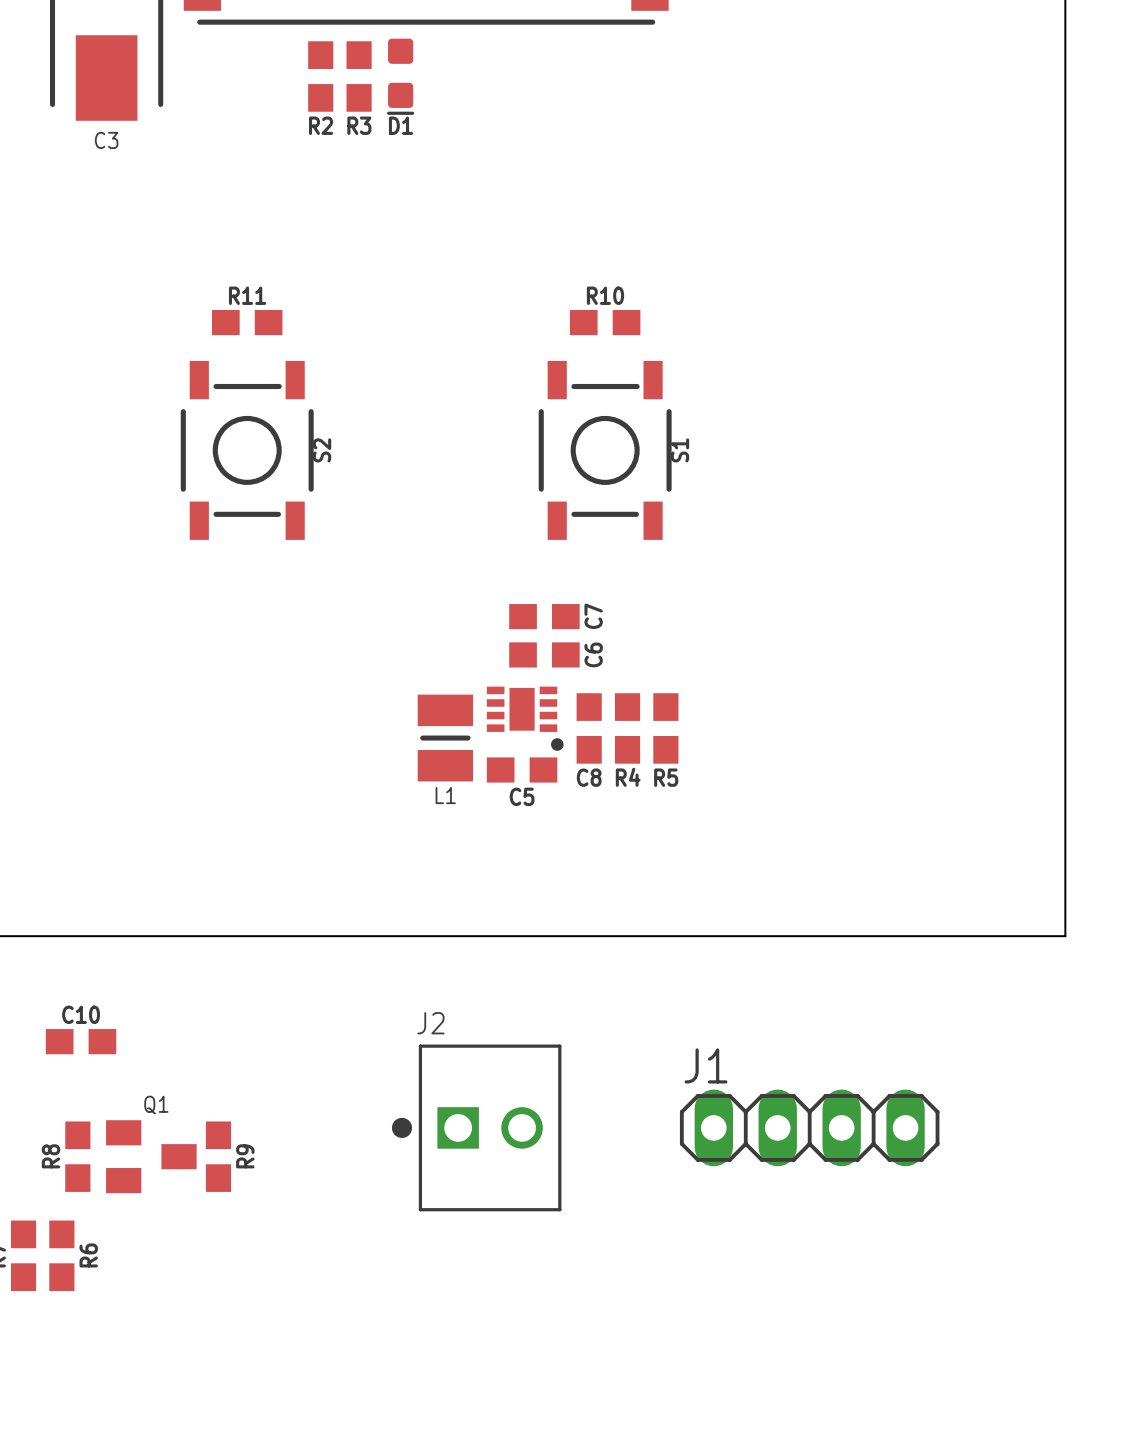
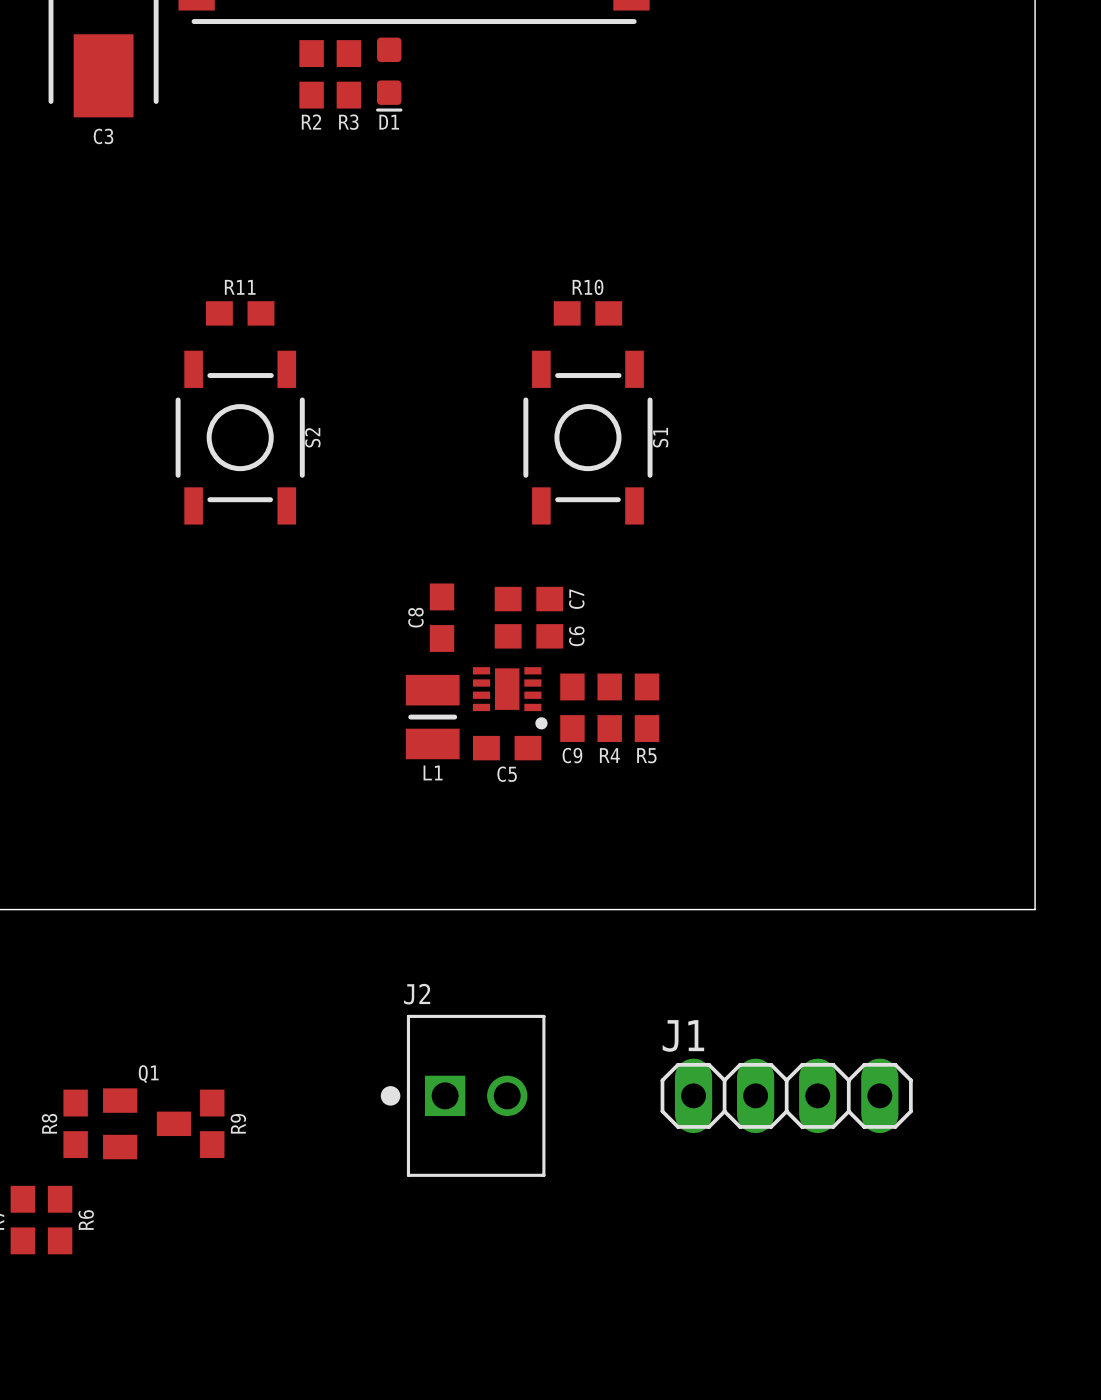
C8: none -> (442, 617)
C8 name: C8 (589, 777) -> C9 (572, 755)
C10: (81, 1041) -> none

